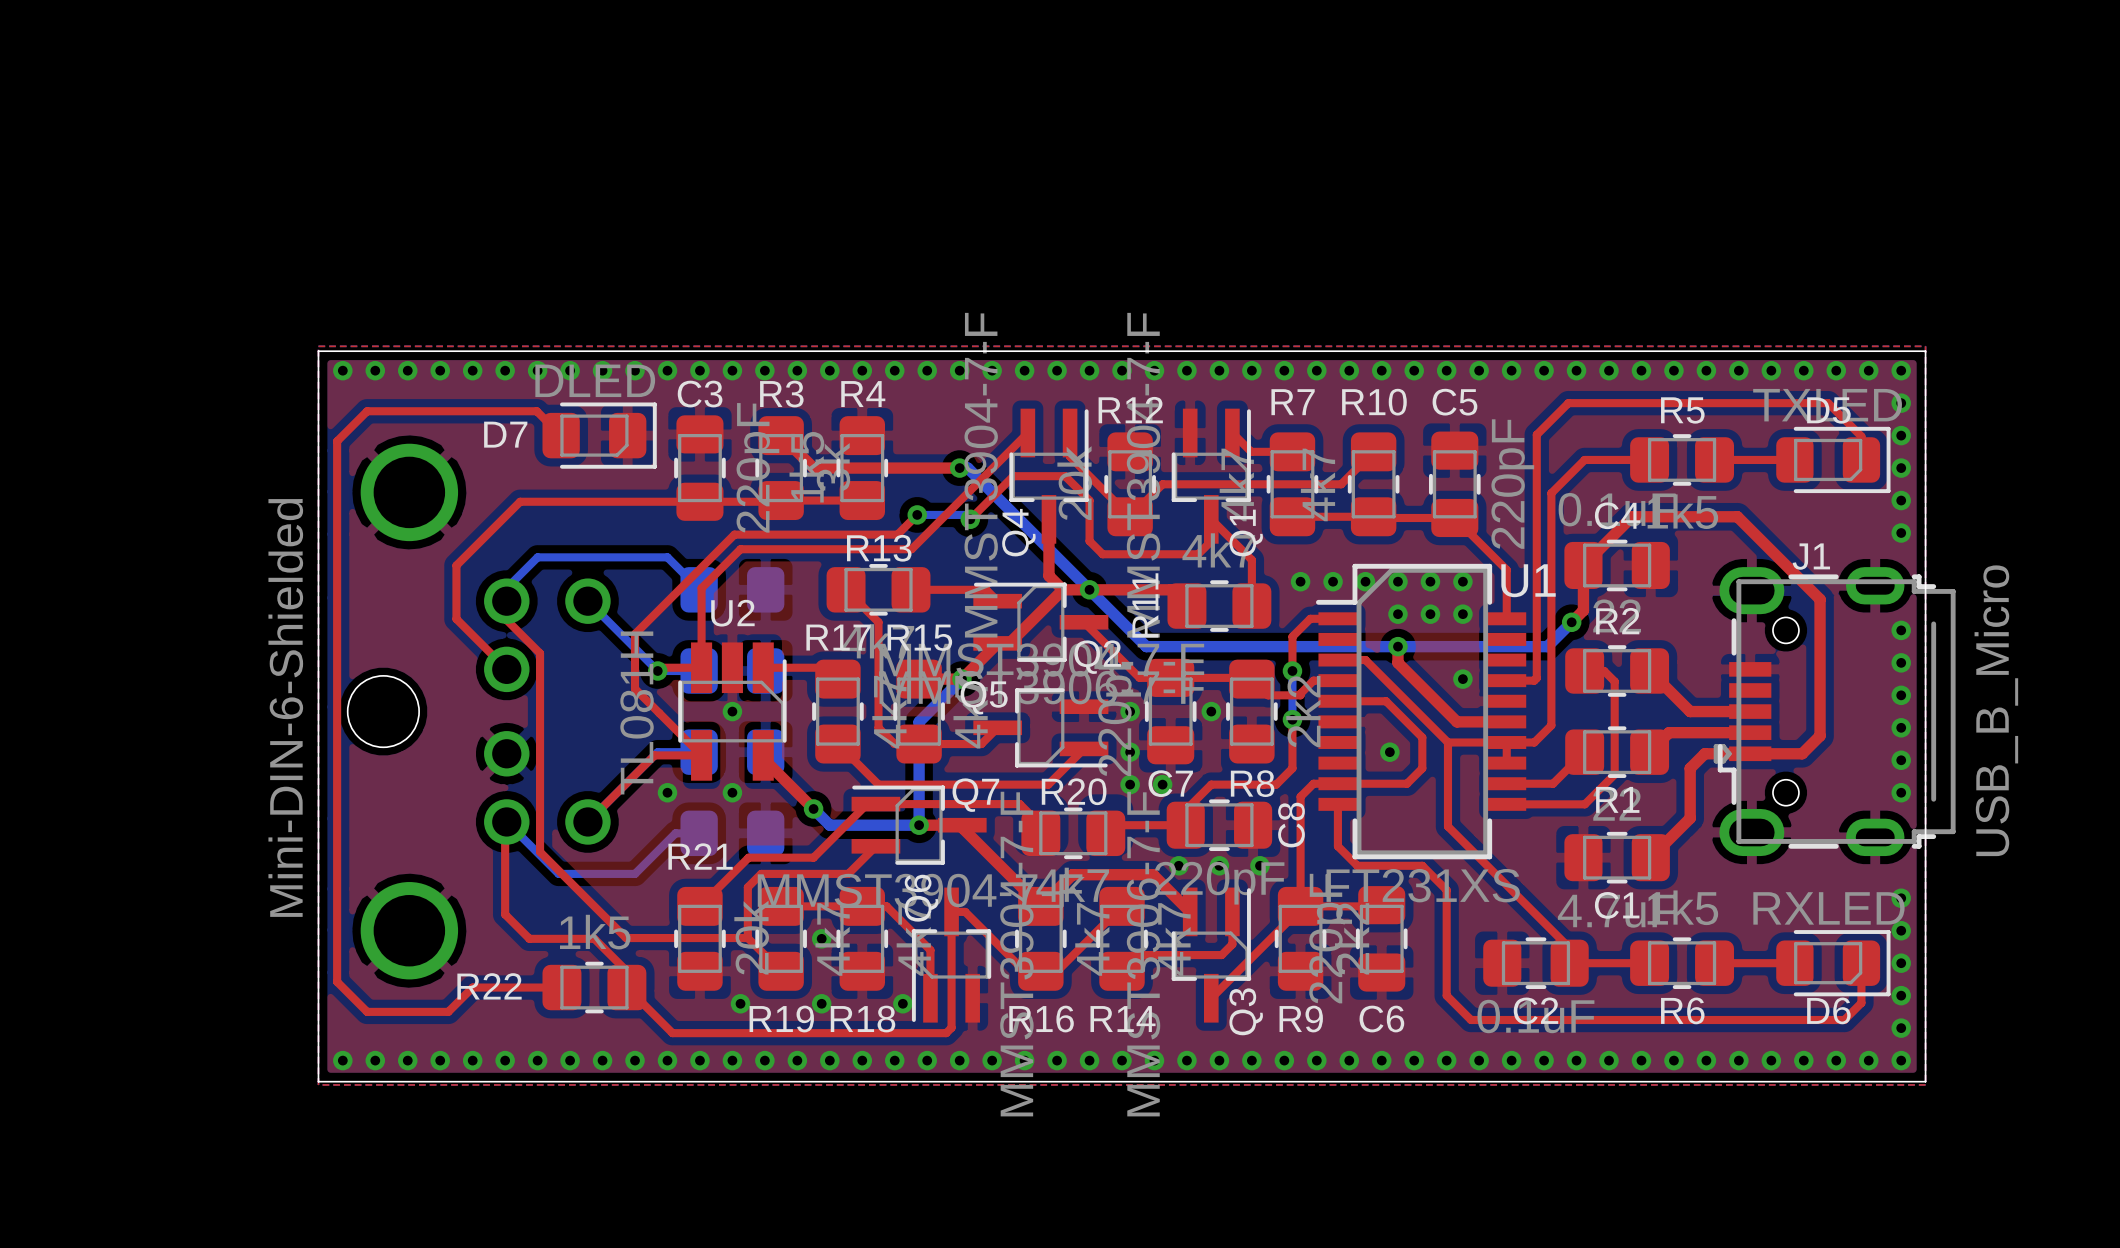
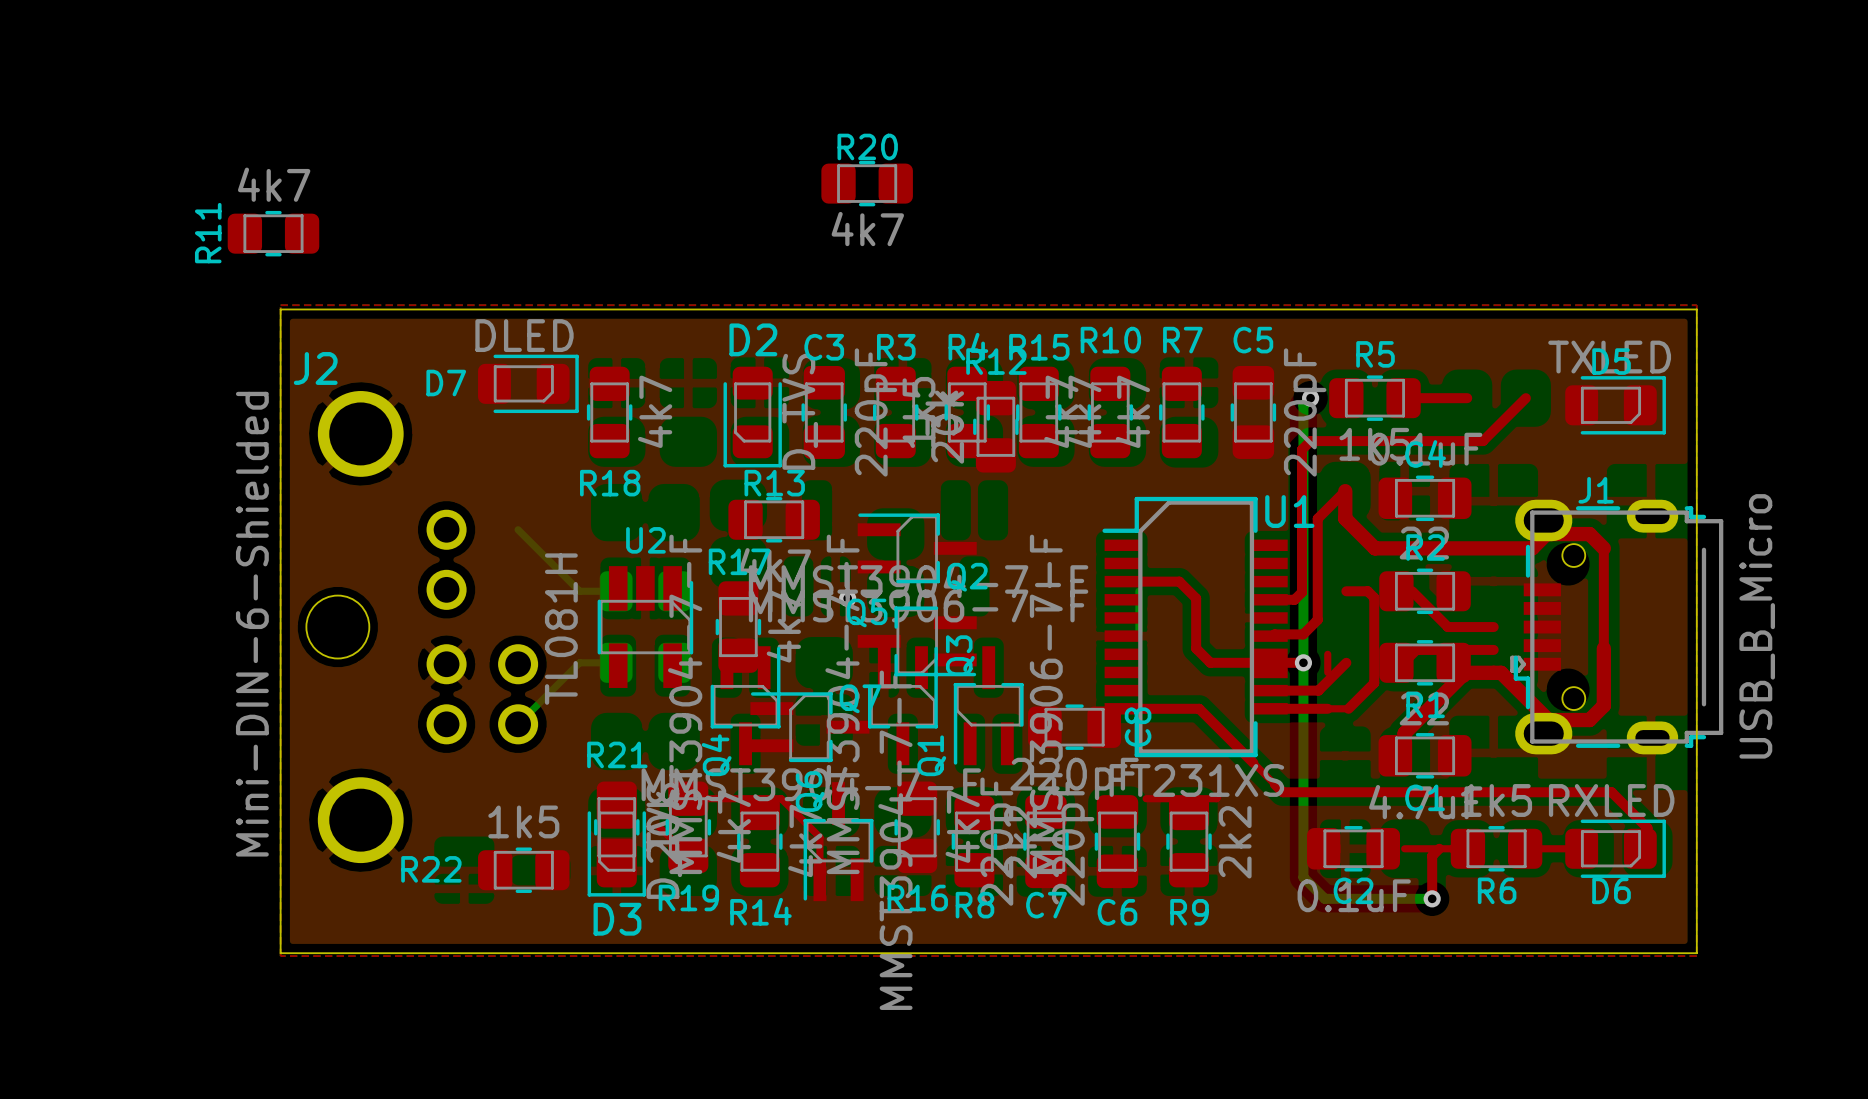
via: (342, 370) -> none
via: (375, 370) -> none
via: (407, 370) -> none
via: (440, 370) -> none
via: (472, 370) -> none
via: (505, 370) -> none
via: (537, 370) -> none
via: (570, 370) -> none
via: (602, 370) -> none
via: (635, 370) -> none
via: (667, 370) -> none
via: (699, 370) -> none
via: (732, 370) -> none
via: (764, 370) -> none
via: (797, 370) -> none
via: (829, 370) -> none
via: (862, 370) -> none
via: (894, 370) -> none
via: (927, 370) -> none
via: (959, 370) -> none
via: (992, 370) -> none
via: (1024, 370) -> none
via: (1057, 370) -> none
via: (1089, 370) -> none
via: (1122, 370) -> none
via: (1154, 370) -> none
via: (1186, 370) -> none
via: (1219, 370) -> none
via: (1251, 370) -> none
via: (1284, 370) -> none
via: (1316, 370) -> none
via: (1349, 370) -> none
via: (1381, 370) -> none
via: (1414, 370) -> none
via: (1446, 370) -> none
via: (1479, 370) -> none
via: (1511, 370) -> none
via: (1544, 370) -> none
via: (1576, 370) -> none
via: (1609, 370) -> none
via: (1641, 370) -> none
via: (1673, 370) -> none
via: (1706, 370) -> none
via: (1738, 370) -> none
via: (1771, 370) -> none
via: (1803, 370) -> none
via: (1836, 370) -> none
via: (1868, 370) -> none
via: (1901, 370) -> none
via: (1901, 403) -> none
top track: (1027, 433) (911, 549) (740, 549) (701, 588) (701, 667) (660, 667) (657, 670) -> none
top track: (1070, 433) (1070, 456) (1130, 516) (1162, 484) (1341, 484) (1373, 451) -> none
top track: (1232, 433) (1251, 451) (1292, 451) -> none
top track: (561, 435) (536, 411) (367, 411) (337, 441) (337, 981) (367, 1011) (448, 1011) (472, 987) (561, 987) -> none
top track: (781, 435) (813, 468) (959, 468) -> none
via: (1901, 435) -> none
bottom track: none -> (1310, 398) (1303, 405) (1303, 877) (1324, 898) (1432, 898)
via: none -> (1310, 398)
top track: none -> (1403, 398) (1467, 398)
top track: none -> (1525, 398) (1482, 441) (1310, 441) (1302, 449) (1302, 592) (1294, 599) (1270, 599)
top track: (1649, 459) (1584, 459) (1551, 493) (1551, 725) (1534, 742) (1447, 742) -> none
R5 position: (1682, 459) -> (1374, 398)
top track: (1714, 459) (1794, 459) -> none
top track: (1861, 459) (1861, 436) (1828, 403) (1568, 403) (1536, 434) (1536, 678) (1534, 680) (1506, 680) -> none
C3 position: (699, 468) -> (824, 412)
R3 position: (781, 468) -> (895, 412)
R4 position: (862, 468) -> (967, 412)
bottom track: (959, 468) (967, 468) (1146, 646) (1547, 646) (1571, 622) -> none
via: (959, 468) -> none
via: (1901, 468) -> none
Q4 position: (1049, 476) -> (745, 705)
Q1 position: (1211, 476) -> (903, 705)
R7 position: (1292, 484) -> (1181, 412)
R10 position: (1373, 484) -> (1110, 412)
C5 position: (1454, 484) -> (1253, 412)
top track: (862, 500) (520, 501) (456, 565) (456, 619) (506, 669) -> none
via: (1901, 500) -> none
top track: (917, 514) (897, 534) (734, 534) (635, 634) (635, 688) (701, 755) (654, 755) (587, 821) -> none
bottom track: (917, 514) (965, 514) (970, 519) -> none
via: (917, 514) -> none
top track: (1292, 516) (1454, 517) (1506, 569) (1506, 618) -> none
top track: (970, 519) (1013, 476) (1065, 476) (1089, 500) (1089, 541) (1102, 554) (1198, 554) (1211, 541) (1211, 519) (1251, 559) (1251, 606) -> none
via: (970, 519) -> none
top track: (1048, 519) (1048, 575) (1062, 589) -> none
via: (1901, 533) -> none
via: (1300, 581) -> none
via: (1333, 581) -> none
via: (1365, 581) -> none
via: (1397, 581) -> none
via: (1430, 581) -> none
via: (1462, 581) -> none
bottom track: (699, 589) (667, 557) (537, 557) (506, 588) (506, 601) -> none
D2 side: bottom (732, 589) -> top (752, 417)
top track: (846, 589) (878, 622) (878, 727) (894, 744) (981, 744) (997, 727) -> none
top track: (910, 589) (986, 589) (997, 601) -> none
top track: (1062, 589) (1170, 589) (1186, 606) -> none
top track: (1062, 589) (1009, 643) (997, 643) (961, 679) (919, 679) -> none
via: (1089, 589) -> none
top track: (506, 601) (506, 620) (540, 653) (540, 851) (626, 938) (747, 938) (747, 887) (761, 873) (848, 873) (875, 846) -> none
R11 position: (1219, 606) -> (273, 233)
via: (1397, 614) -> none
via: (1430, 614) -> none
via: (1462, 614) -> none
top track: (1337, 618) (1310, 618) (1292, 636) (1292, 670) -> none
top track: (1084, 622) (1139, 677) (1250, 677) (1268, 695) (1300, 695) (1313, 680) (1337, 680) -> none
top track: (1571, 622) (1583, 610) (1583, 565) (1632, 516) (1737, 516) (1820, 599) (1820, 622) -> (1270, 636) (1274, 634) (1303, 634) (1317, 619) (1317, 518) (1345, 491) (1345, 518) (1374, 548) (1532, 548) (1546, 534) (1589, 534) (1603, 548)
via: (1571, 622) -> none
via: (1901, 630) -> none
top track: (1397, 646) (1397, 662) (1456, 721) (1506, 721) -> none
via: (1397, 646) -> none
top track: none -> (1121, 581) (1178, 581)
top track: (1338, 660) (1365, 660) (1447, 742) -> (1179, 581) (1196, 598) (1196, 648) (1210, 662) (1303, 662)
via: (1901, 662) -> none
top track: (763, 667) (826, 667) (837, 679) -> none
via: (657, 670) -> none
via: (1292, 670) -> none
top track: (1602, 670) (1614, 681) (1614, 774) (1584, 804) (1530, 804) -> (1346, 591) (1367, 591) (1374, 597) (1374, 683) (1348, 708)
top track: (1649, 670) (1690, 711) -> (1412, 591) (1447, 627) (1489, 627)
bottom track: (961, 679) (919, 721) (919, 825) (829, 825) (813, 808) -> none
via: (1462, 679) -> none
via: (1901, 695) -> none
top track: (1337, 701) (1386, 701) (1422, 737) (1422, 768) (1406, 783) (1313, 783) (1300, 796) (1300, 908) (1211, 998) -> none
part: Mini-DIN-6-Shielded (479, 711) -> none
J2: none -> Mini-DIN-6-Shielded (422, 627)
via: (732, 711) -> none
R15 position: (919, 711) -> (1038, 412)
via: (1130, 711) -> none
C7 position: (1170, 711) -> (1045, 841)
via: (1211, 711) -> none
R8 position: (1251, 711) -> (974, 841)
U1 position: (1421, 711) -> (1195, 627)
top track: (1695, 711) (1750, 711) -> none
top track: (1292, 719) (1292, 768) (1276, 784) (1211, 784) (1185, 810) (1185, 825) (1105, 825) -> none
via: (1292, 719) -> none
via: (1901, 727) -> none
top track: (1750, 732) (1669, 732) (1649, 752) -> none
top track: (1820, 735) (1802, 753) (1704, 753) (1690, 768) (1690, 818) (1650, 857) -> (1603, 648) (1603, 705) (1589, 720) (1548, 720) (1501, 672) (1465, 672) (1404, 733) (1404, 755)
top track: none -> (1493, 649) (1416, 649) (1403, 662)
top track: (1447, 742) (1447, 826) (1569, 948) (1569, 963) (1594, 963) -> none
top track: (837, 744) (878, 784) (1048, 784) (1084, 748) -> none
via: (1130, 752) -> none
via: (1389, 752) -> none
via: none -> (1303, 662)
top track: none -> (1346, 662) (1318, 690) (1270, 690)
top track: (1584, 752) (1553, 783) (1506, 783) -> none
top track: (763, 755) (763, 758) (813, 808) -> none
via: (1901, 760) -> none
via: (1130, 784) -> none
via: (1162, 784) -> none
via: (667, 792) -> none
via: (732, 792) -> none
via: (1901, 792) -> none
top track: (1337, 804) (1337, 846) (1357, 865) (1422, 865) -> (1121, 708) (1199, 708) (1253, 762)
top track: none -> (1270, 708) (1327, 708)
via: (813, 808) -> none
top track: (506, 821) (505, 823) (505, 914) (529, 938) (594, 938) (626, 971) (626, 987) (672, 1033) (946, 1033) (951, 1027) (951, 911) (965, 911) (1024, 971) (1057, 971) (1122, 906) -> none
bottom track: (506, 821) (558, 873) (635, 873) (675, 833) (699, 833) -> none
top track: (919, 825) (962, 825) (962, 827) (1040, 906) (1072, 874) (1153, 874) (1190, 911) -> none
via: (919, 825) -> none
top track: (1040, 825) (1019, 804) (867, 804) (813, 857) (748, 857) (699, 906) -> none
D3 side: bottom (732, 833) -> top (616, 846)
R20 position: (1073, 833) -> (867, 183)
via: (1178, 865) -> none
via: (1219, 865) -> none
via: (1260, 865) -> none
top track: (1446, 890) (1446, 995) (1471, 1020) (1844, 1020) (1861, 1002) (1861, 963) -> (1274, 784) (1282, 792) (1611, 792) (1647, 828) (1647, 848)
via: (1901, 898) -> none
top track: (1232, 911) (1232, 944) (1221, 955) (1138, 955) (1122, 971) -> none
via: (1901, 930) -> none
via: (821, 938) -> none
R18 position: (862, 938) -> (609, 412)
R14 position: (1122, 938) -> (759, 841)
R9 position: (1300, 938) -> (1189, 841)
C6 position: (1381, 938) -> (1117, 841)
Q3 rotation: 0° (1211, 955) -> 180° (988, 705)
Q3 position: (1211, 955) -> (988, 705)
top track: none -> (1439, 848) (1432, 855) (1432, 898)
R6 position: (1682, 963) -> (1496, 848)
via: (1901, 963) -> none
via: (1901, 995) -> none
via: (740, 1003) -> none
via: (821, 1003) -> none
via: (902, 1003) -> none
via: none -> (1432, 898)
via: (1901, 1028) -> none
via: (342, 1060) -> none
via: (375, 1060) -> none
via: (407, 1060) -> none
via: (440, 1060) -> none
via: (472, 1060) -> none
via: (505, 1060) -> none
via: (537, 1060) -> none
via: (570, 1060) -> none
via: (602, 1060) -> none
via: (635, 1060) -> none
via: (667, 1060) -> none
via: (699, 1060) -> none
via: (732, 1060) -> none
via: (764, 1060) -> none
via: (797, 1060) -> none
via: (829, 1060) -> none
via: (862, 1060) -> none
via: (894, 1060) -> none
via: (927, 1060) -> none
via: (959, 1060) -> none
via: (992, 1060) -> none
via: (1024, 1060) -> none
via: (1057, 1060) -> none
via: (1089, 1060) -> none
via: (1122, 1060) -> none
via: (1154, 1060) -> none
via: (1186, 1060) -> none
via: (1219, 1060) -> none
via: (1251, 1060) -> none
via: (1284, 1060) -> none
via: (1316, 1060) -> none
via: (1349, 1060) -> none
via: (1381, 1060) -> none
via: (1414, 1060) -> none
via: (1446, 1060) -> none
via: (1479, 1060) -> none
via: (1511, 1060) -> none
via: (1544, 1060) -> none
via: (1576, 1060) -> none
via: (1609, 1060) -> none
via: (1641, 1060) -> none
via: (1673, 1060) -> none
via: (1706, 1060) -> none
via: (1738, 1060) -> none
via: (1771, 1060) -> none
via: (1803, 1060) -> none
via: (1836, 1060) -> none
via: (1868, 1060) -> none
via: (1901, 1060) -> none

